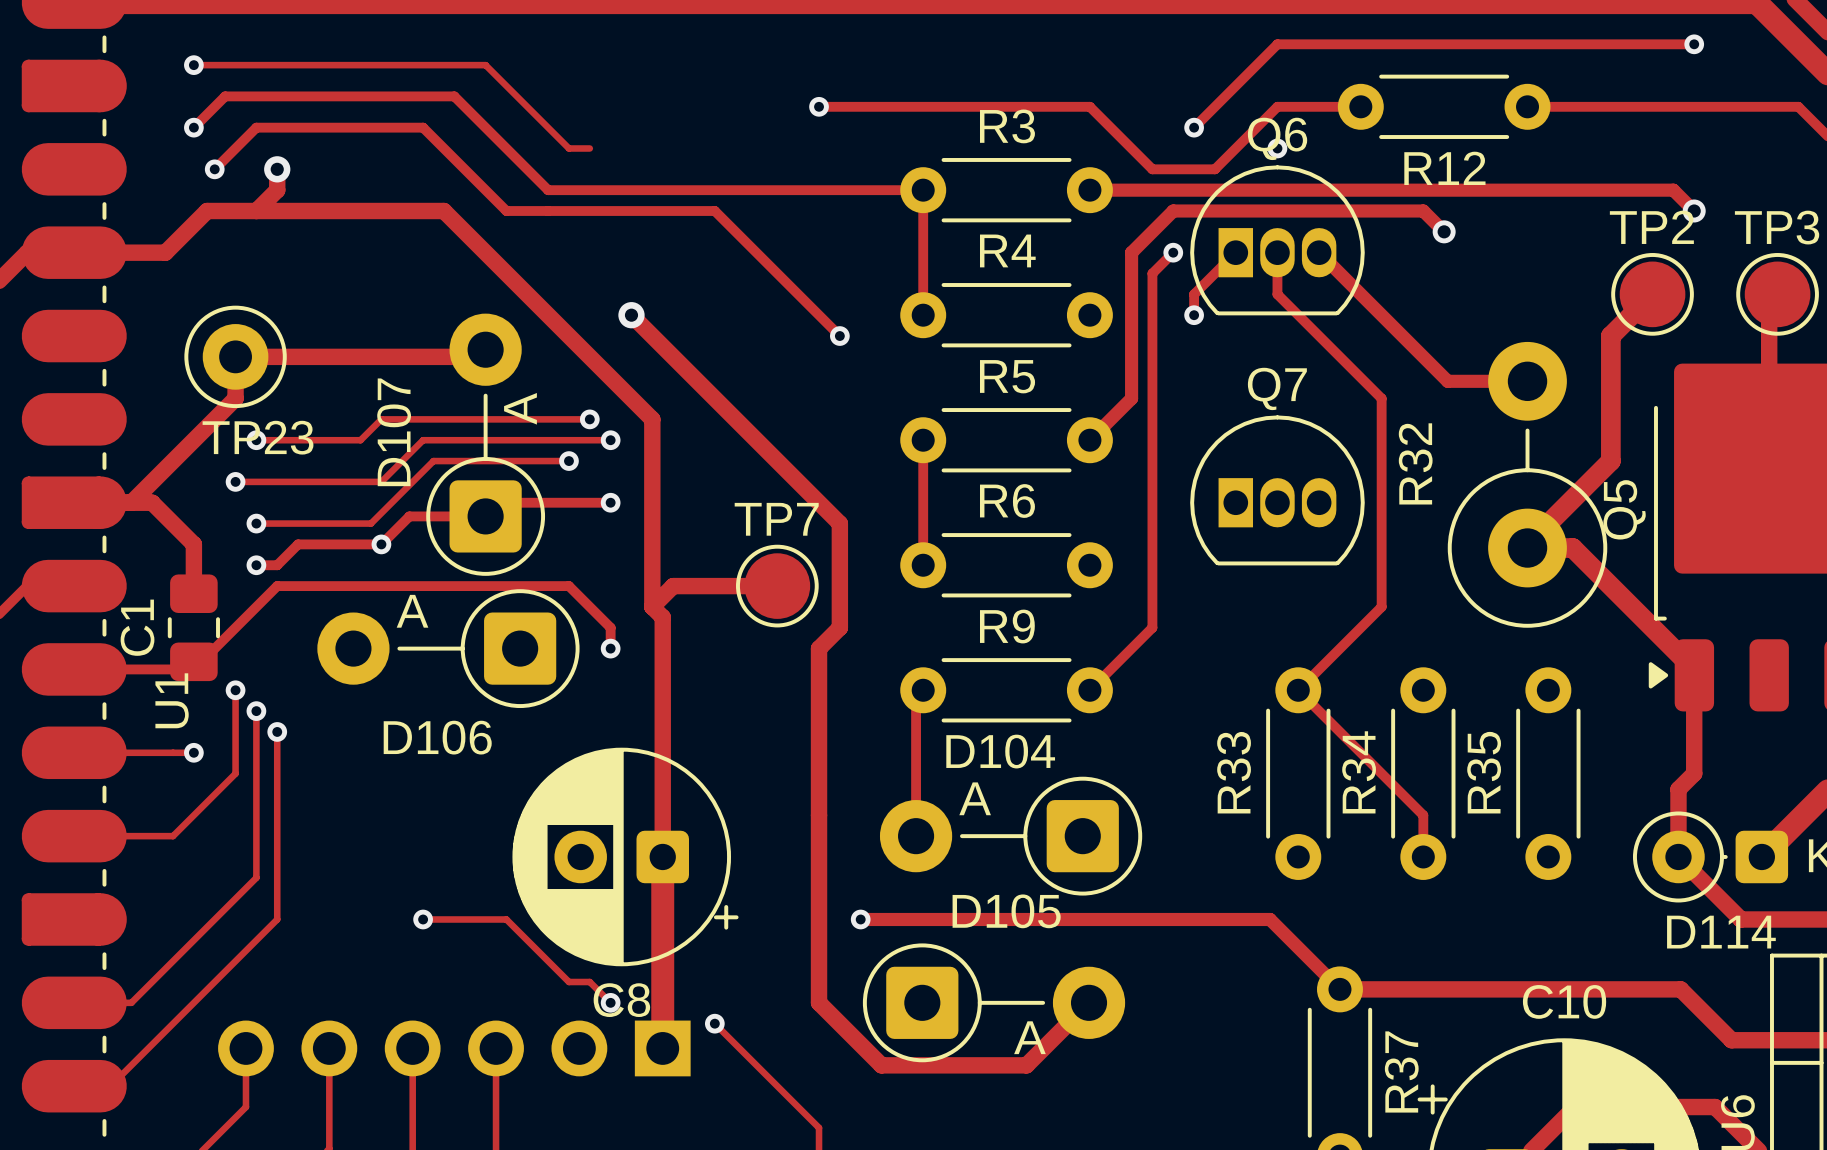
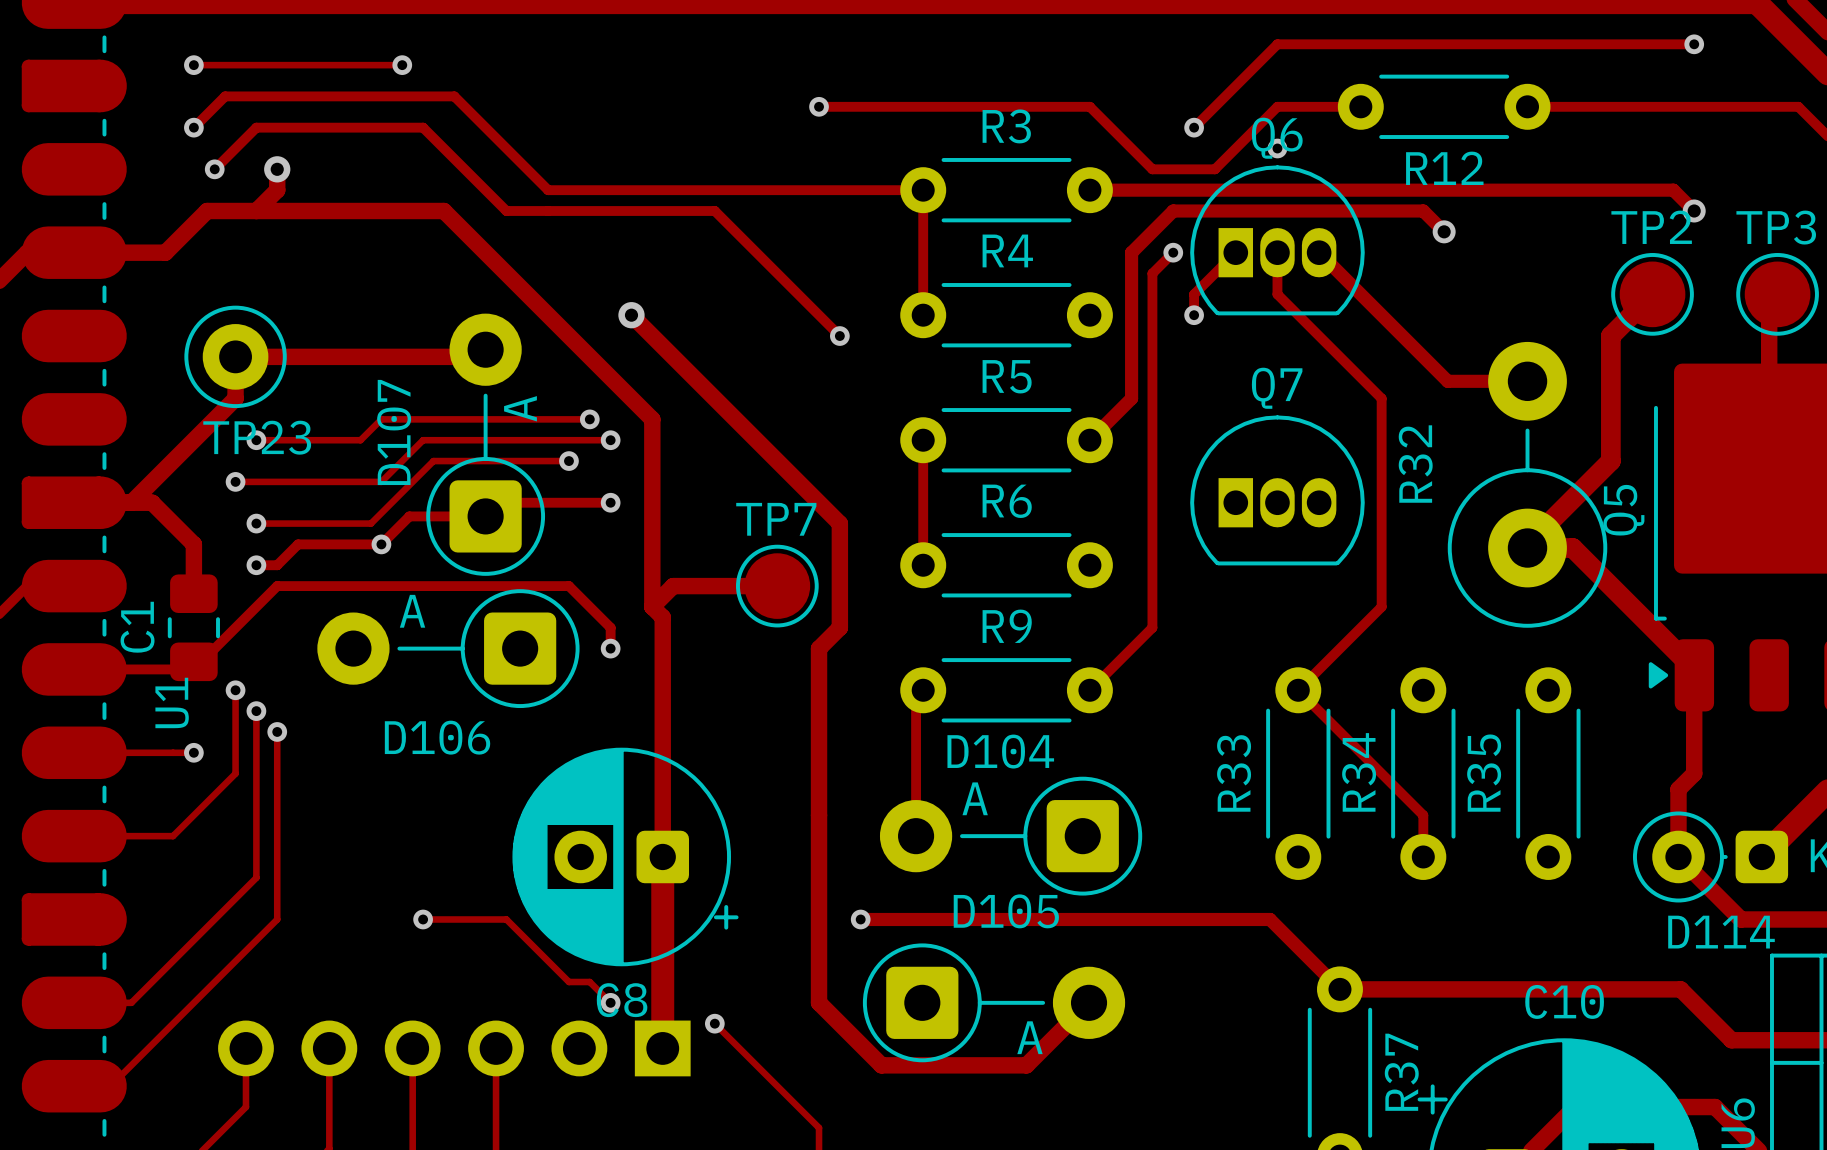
track: (402, 65) (485, 65) (568, 148) (589, 148) -> none
via: none -> (402, 65)

